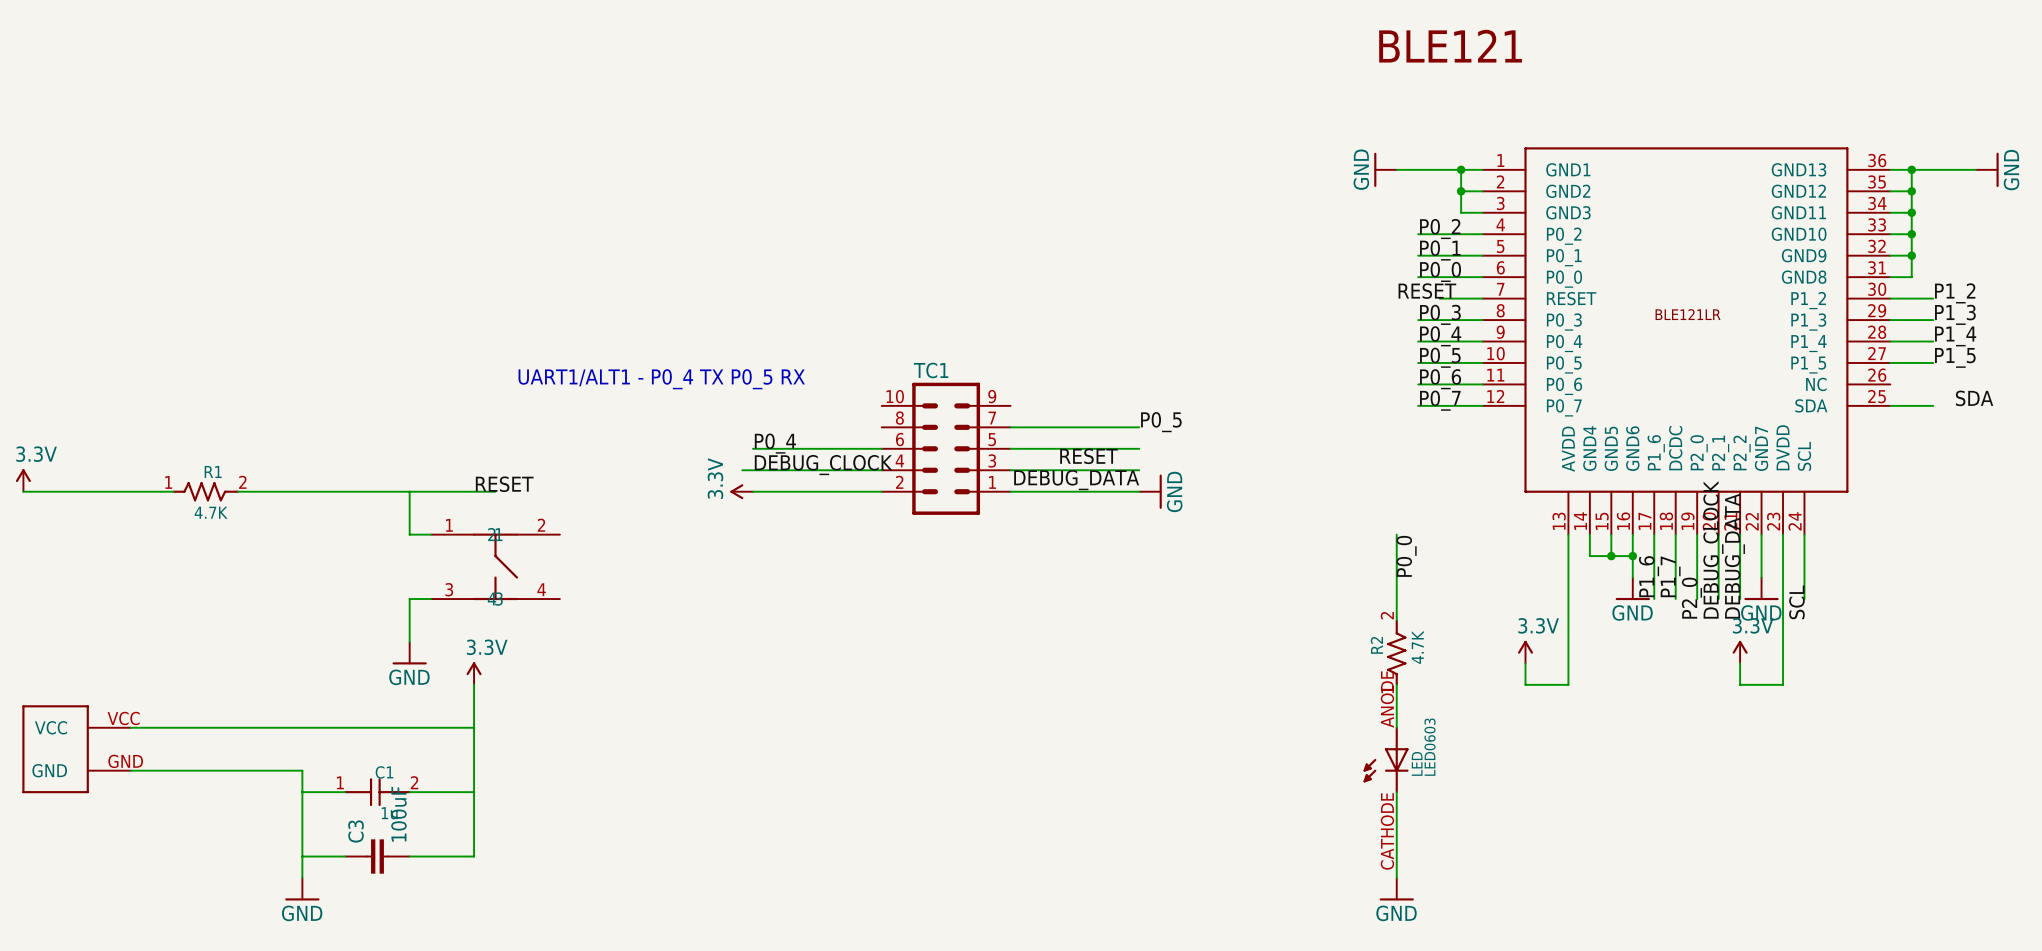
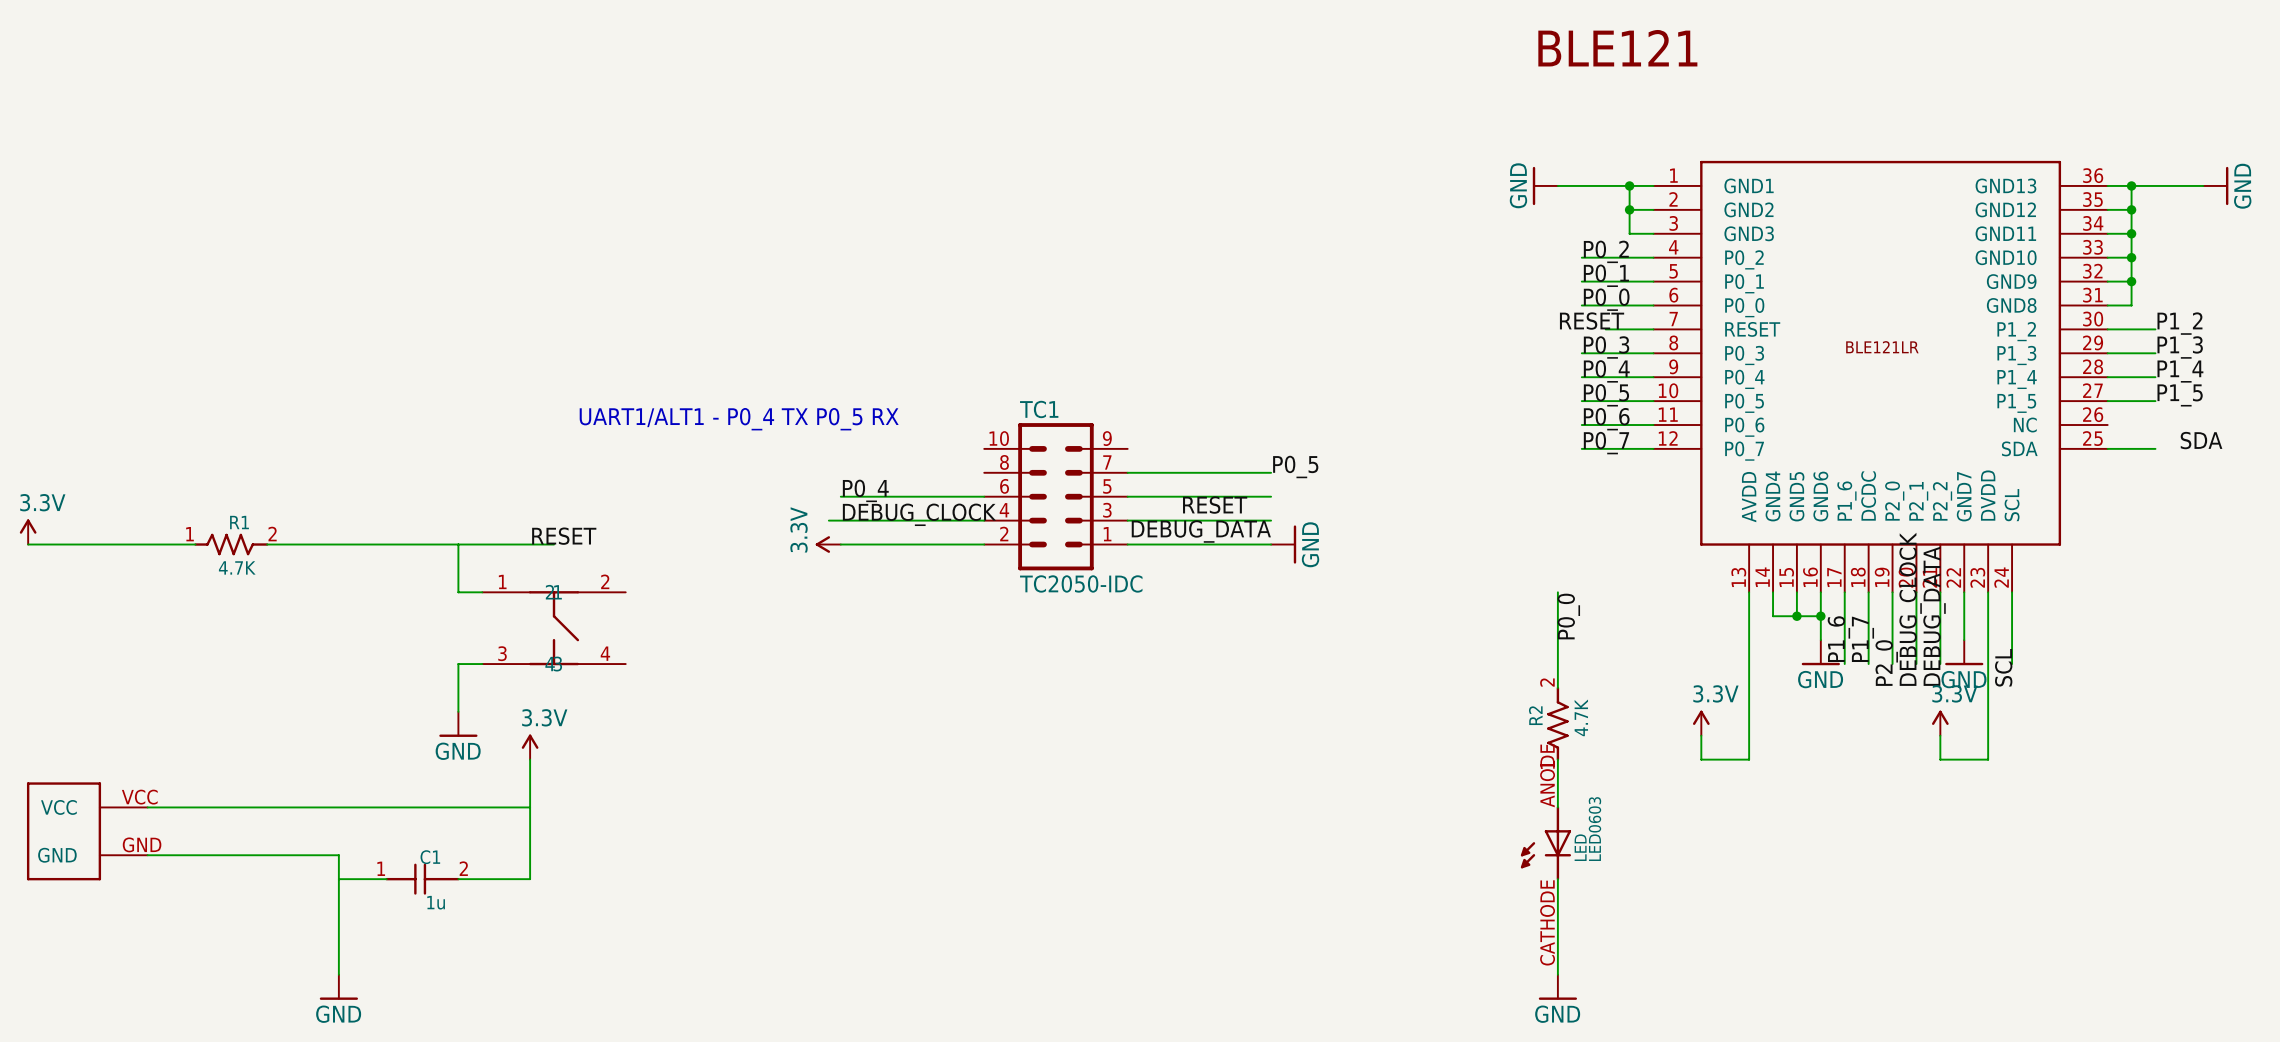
TC1 value: none -> TC2050-IDC (1081, 583)
wire: (474, 792) (474, 856) (409, 856) -> none
wire: (302, 856) (345, 856) -> none
C3: 100uF (377, 856) -> none

